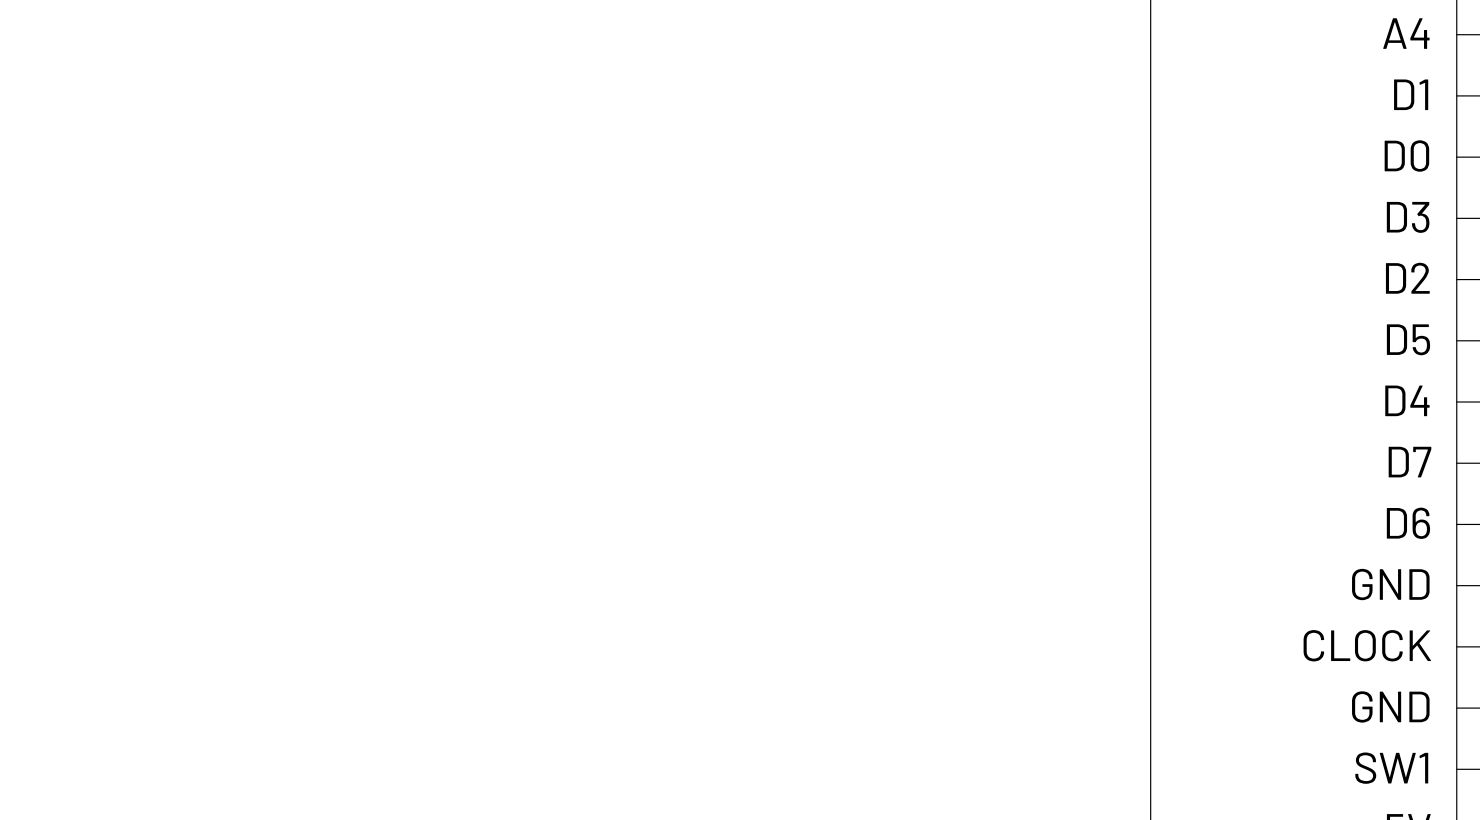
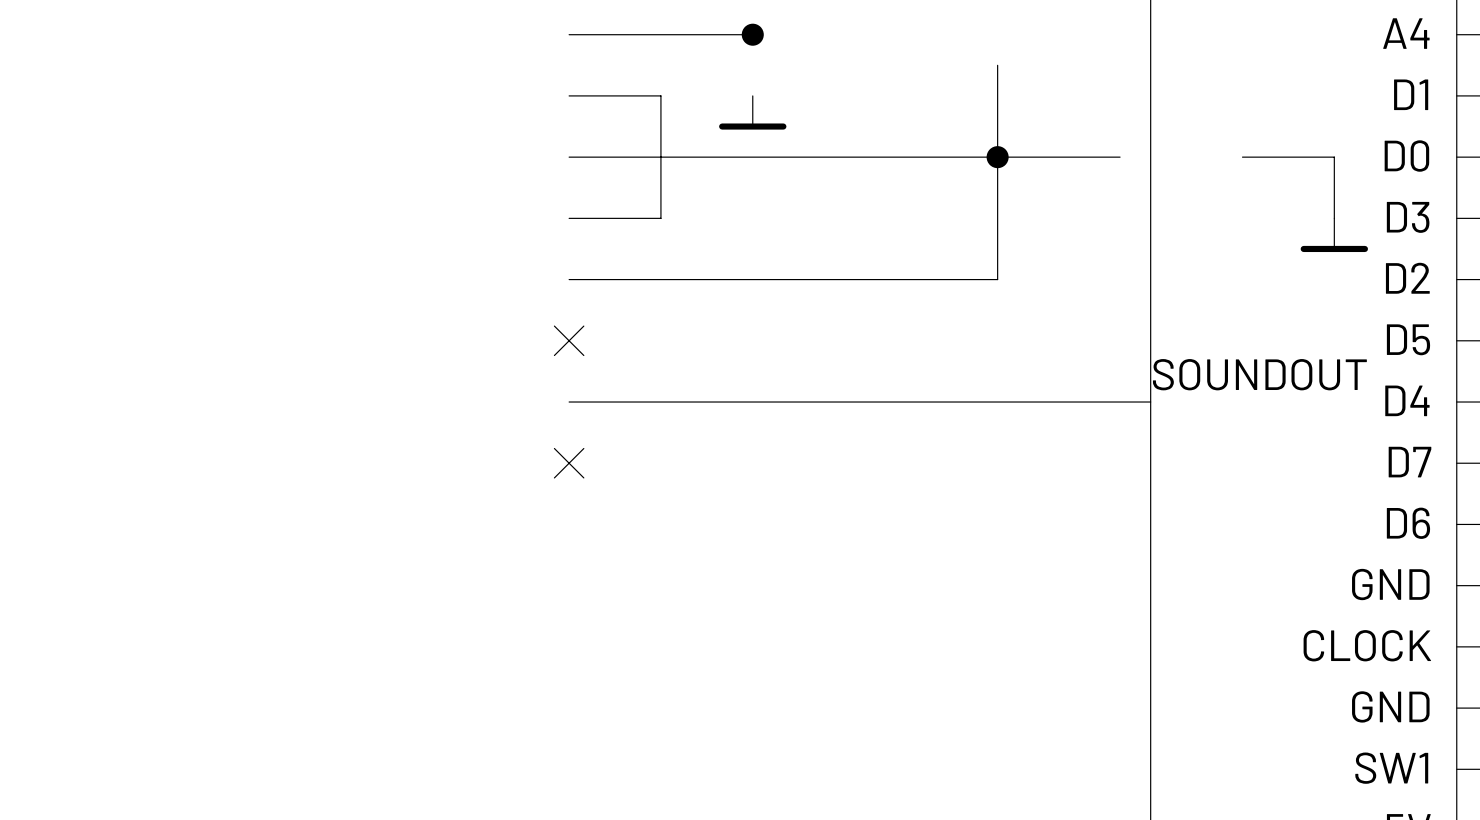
wire: none -> (569, 34) (752, 34)
junction: none -> (752, 34)
wire: none -> (997, 65) (997, 279) (569, 279)
wire: none -> (569, 95) (660, 95) (660, 218) (569, 218)
power symbol: none -> (752, 112)
wire: none -> (569, 157) (1120, 157)
junction: none -> (997, 157)
wire: none -> (1242, 157) (1334, 157) (1334, 218)
power symbol: none -> (1334, 235)
no-connect mark: none -> (569, 340)
label: none -> SOUNDOUT (1259, 374)
wire: none -> (569, 402) (1150, 402)
no-connect mark: none -> (569, 463)

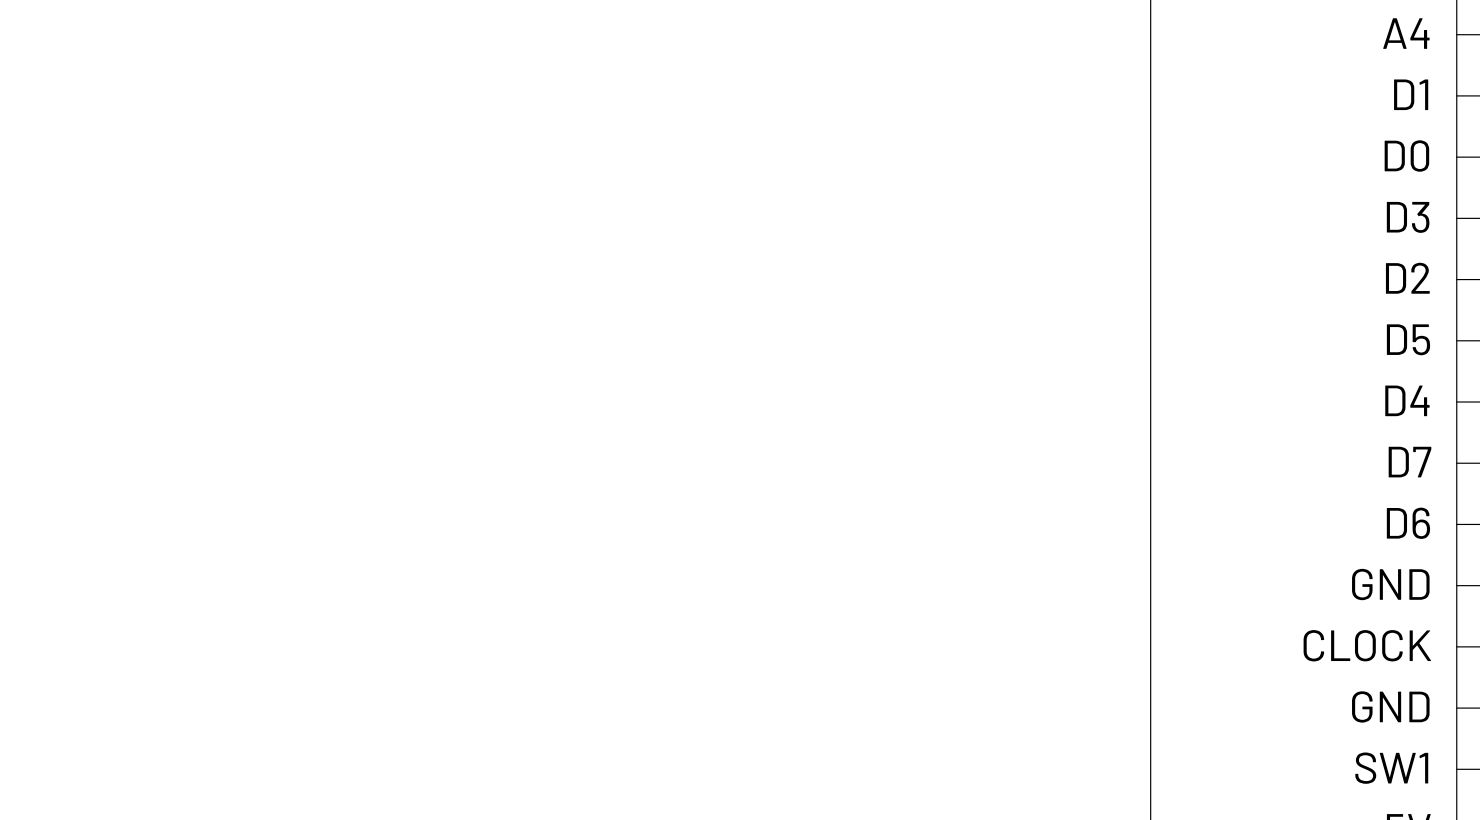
wire: (569, 34) (752, 34) -> none
junction: (752, 34) -> none
wire: (997, 65) (997, 279) (569, 279) -> none
wire: (569, 95) (660, 95) (660, 218) (569, 218) -> none
power symbol: (752, 112) -> none
wire: (569, 157) (1120, 157) -> none
junction: (997, 157) -> none
wire: (1242, 157) (1334, 157) (1334, 218) -> none
power symbol: (1334, 235) -> none
no-connect mark: (569, 340) -> none
label: SOUNDOUT (1259, 374) -> none
wire: (569, 402) (1150, 402) -> none
no-connect mark: (569, 463) -> none

